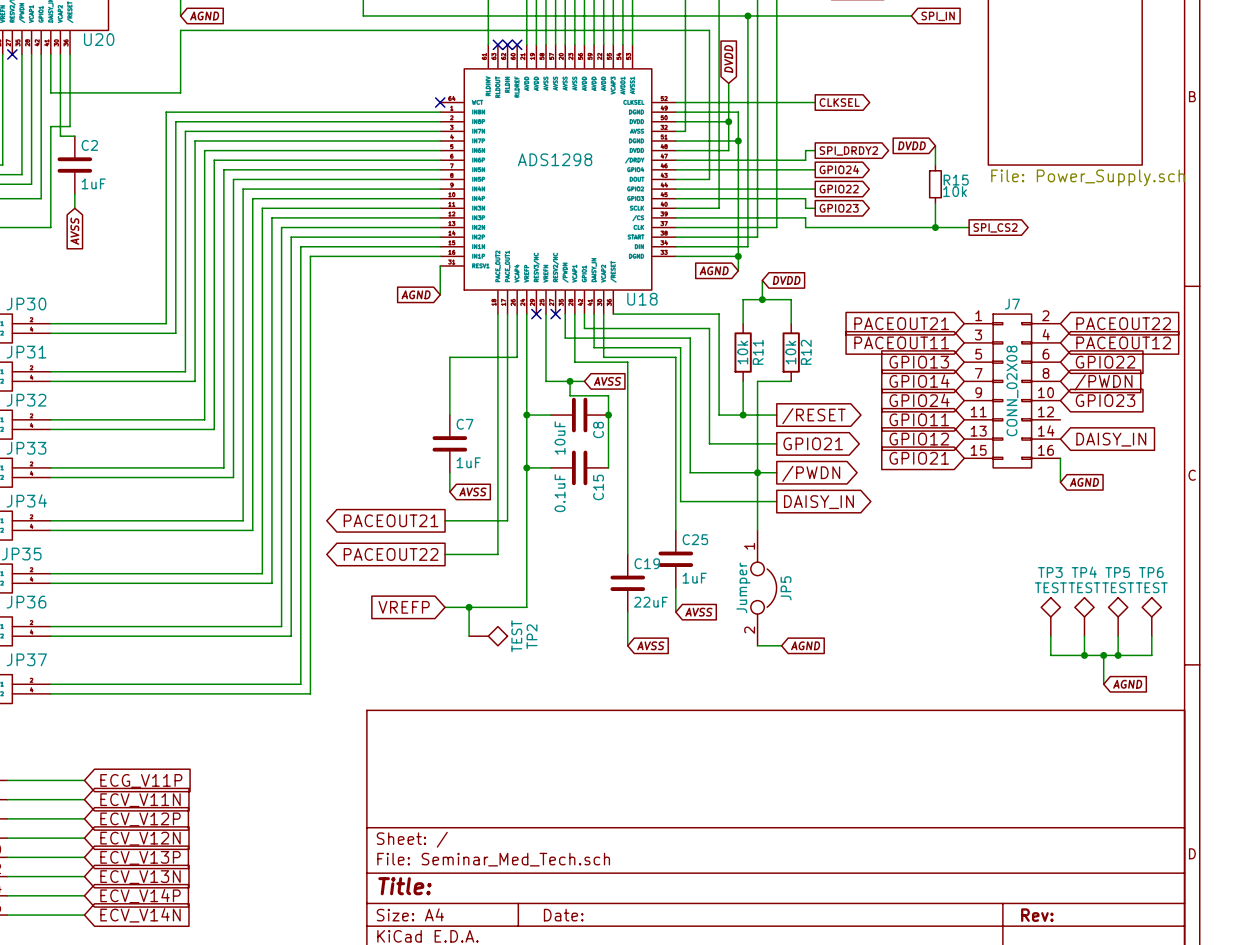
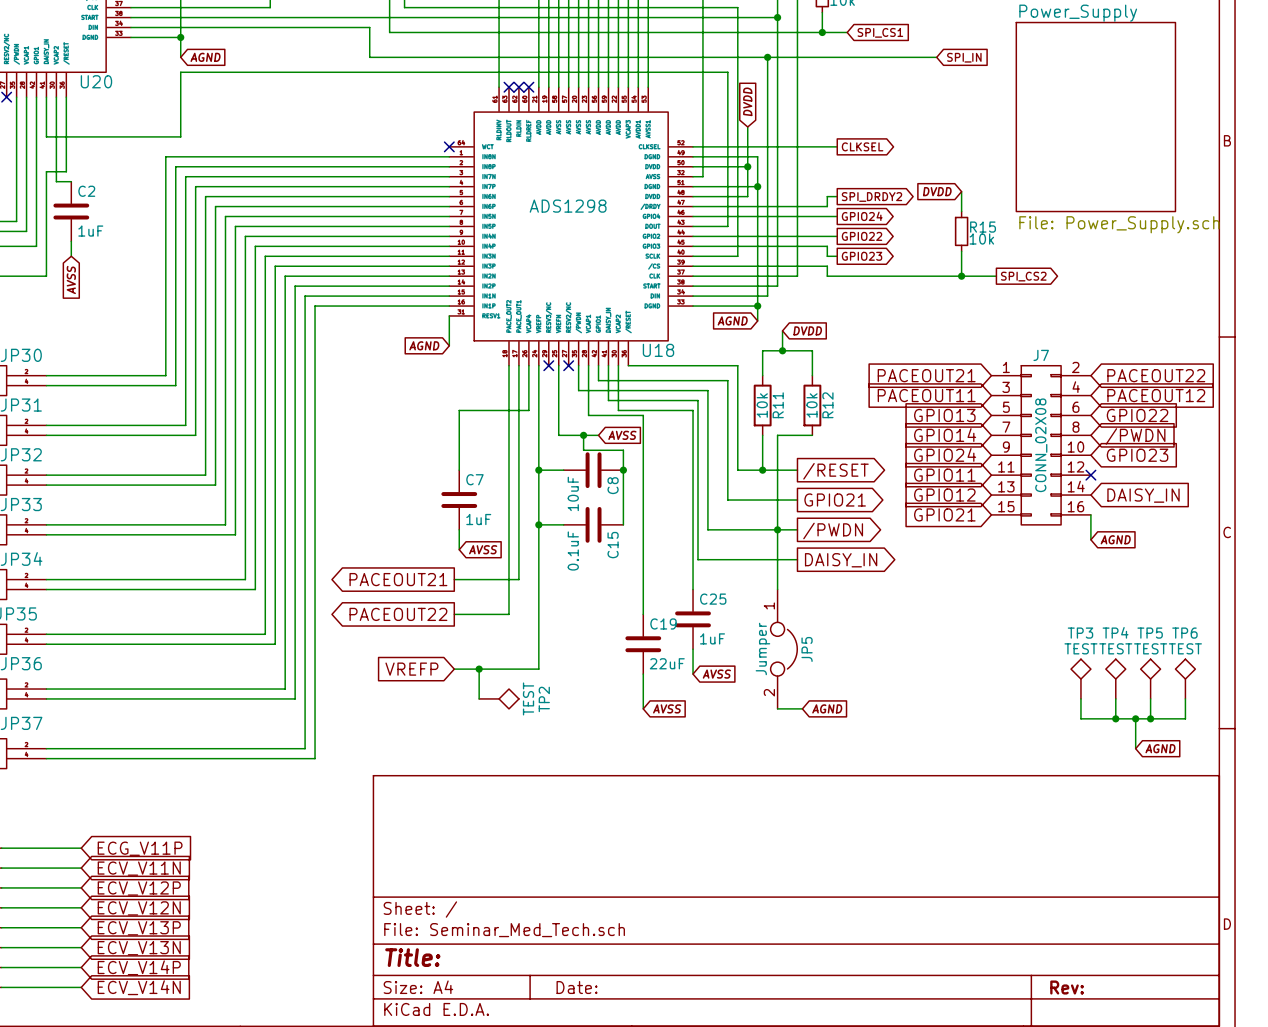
no-connect mark: none -> (1090, 475)

